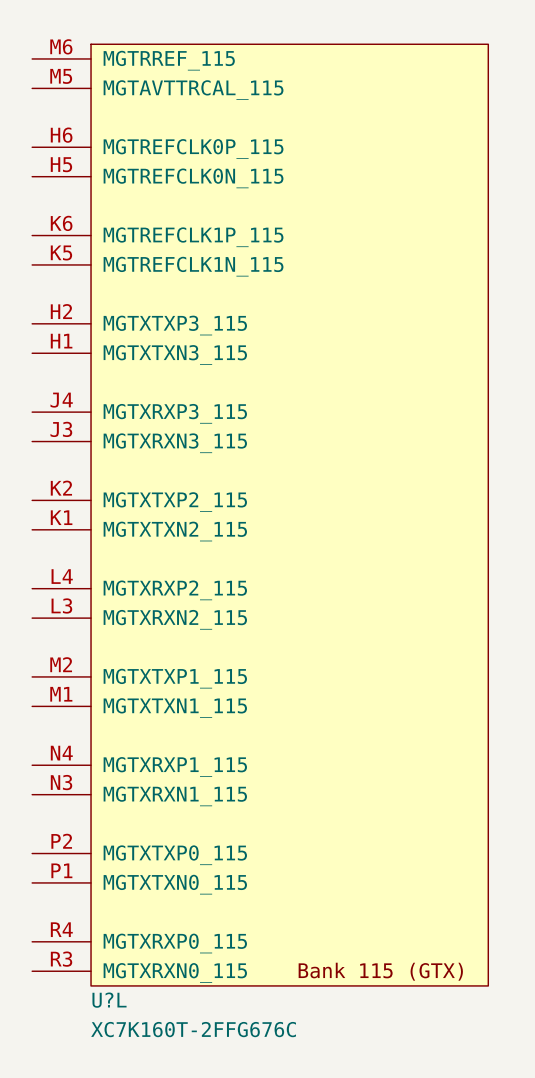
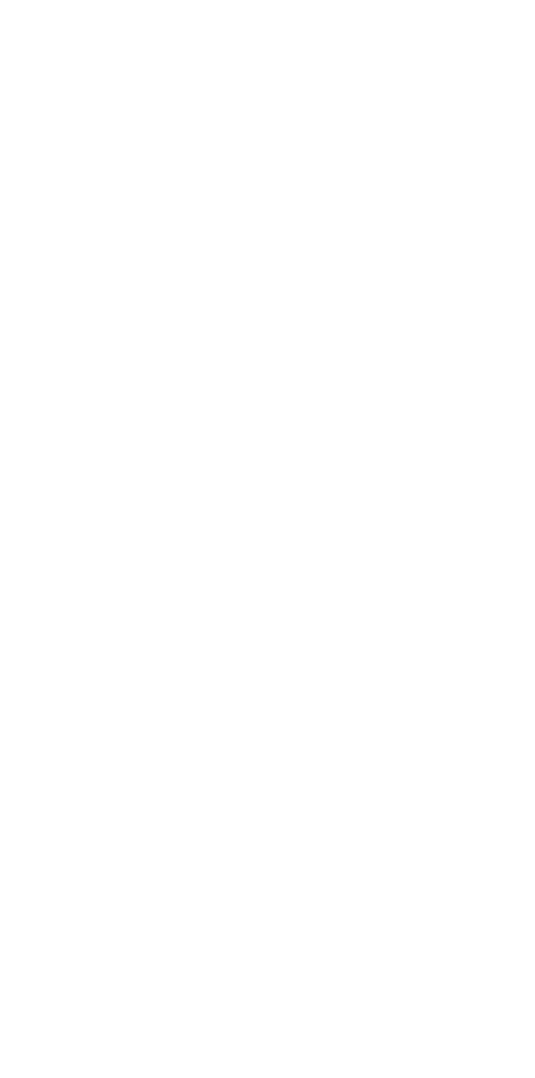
U?L: XC7K160T-2FFG676C (260, 515) -> none

